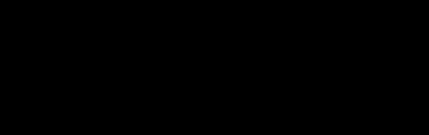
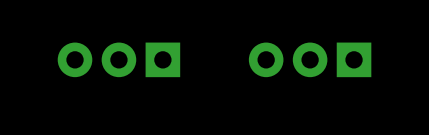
part: none -> (118, 59)
part: none -> (310, 59)

